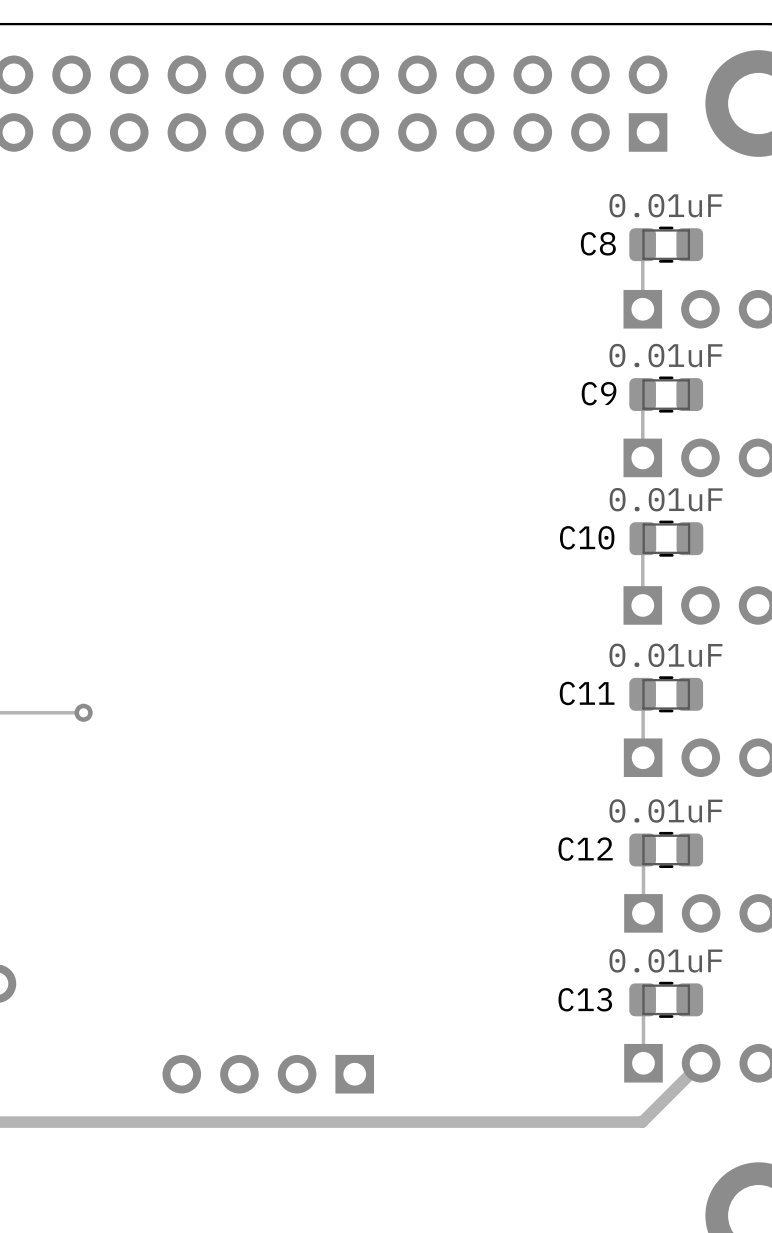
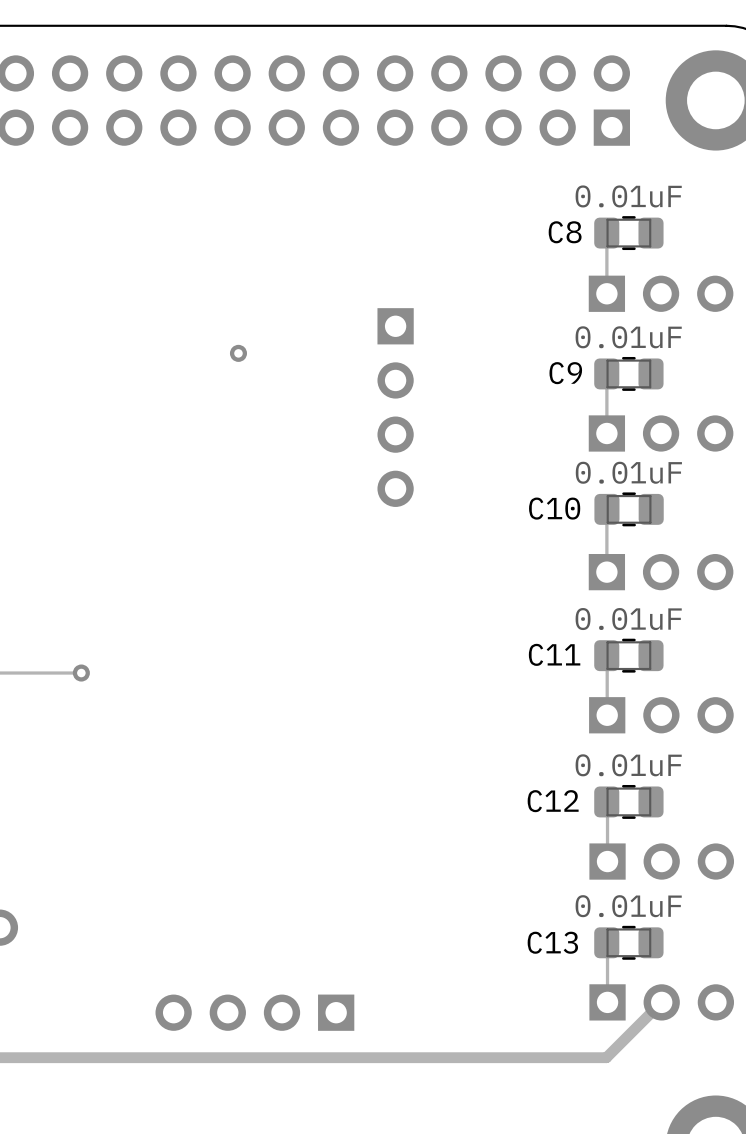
via: none -> (238, 353)
part: none -> (395, 407)

